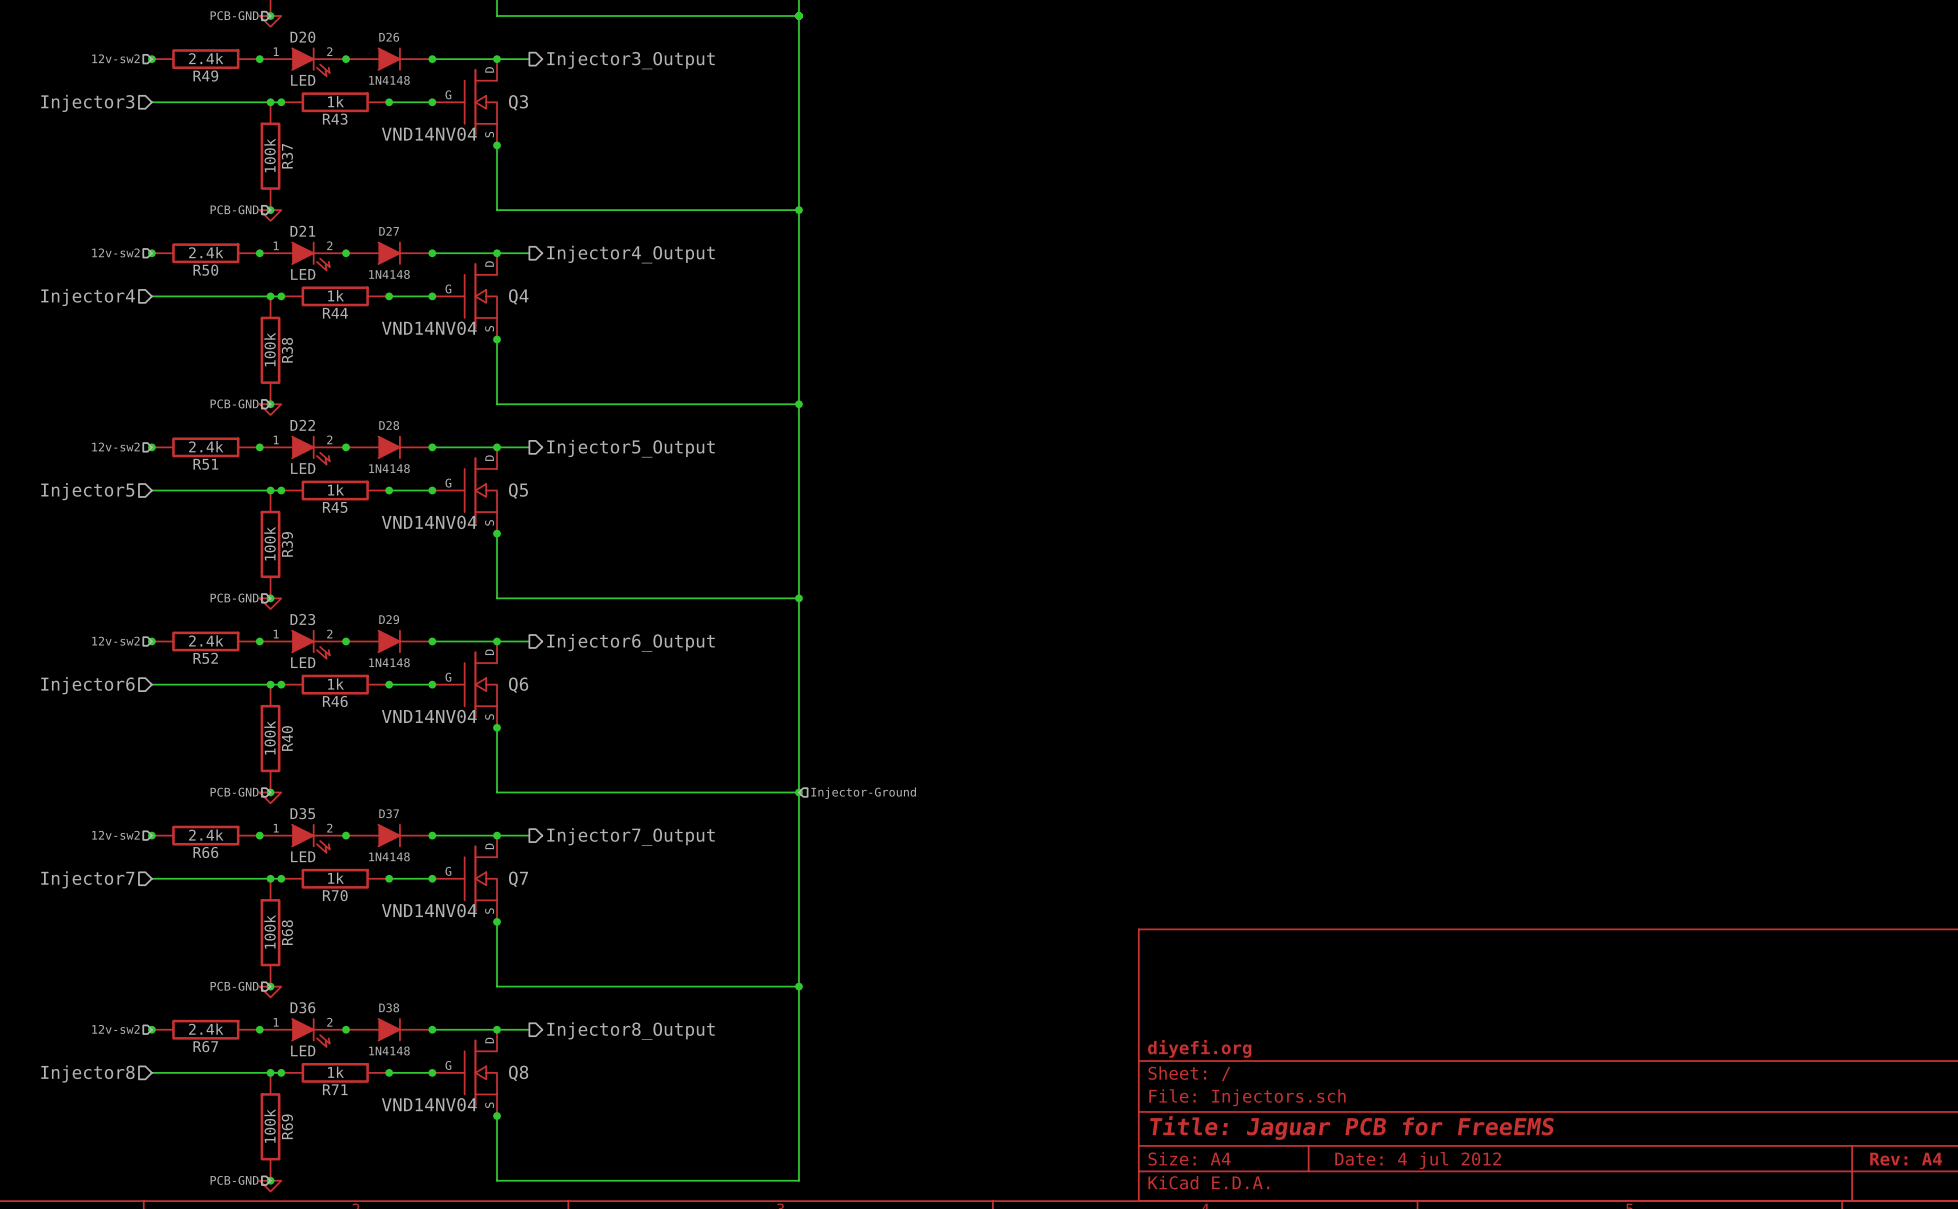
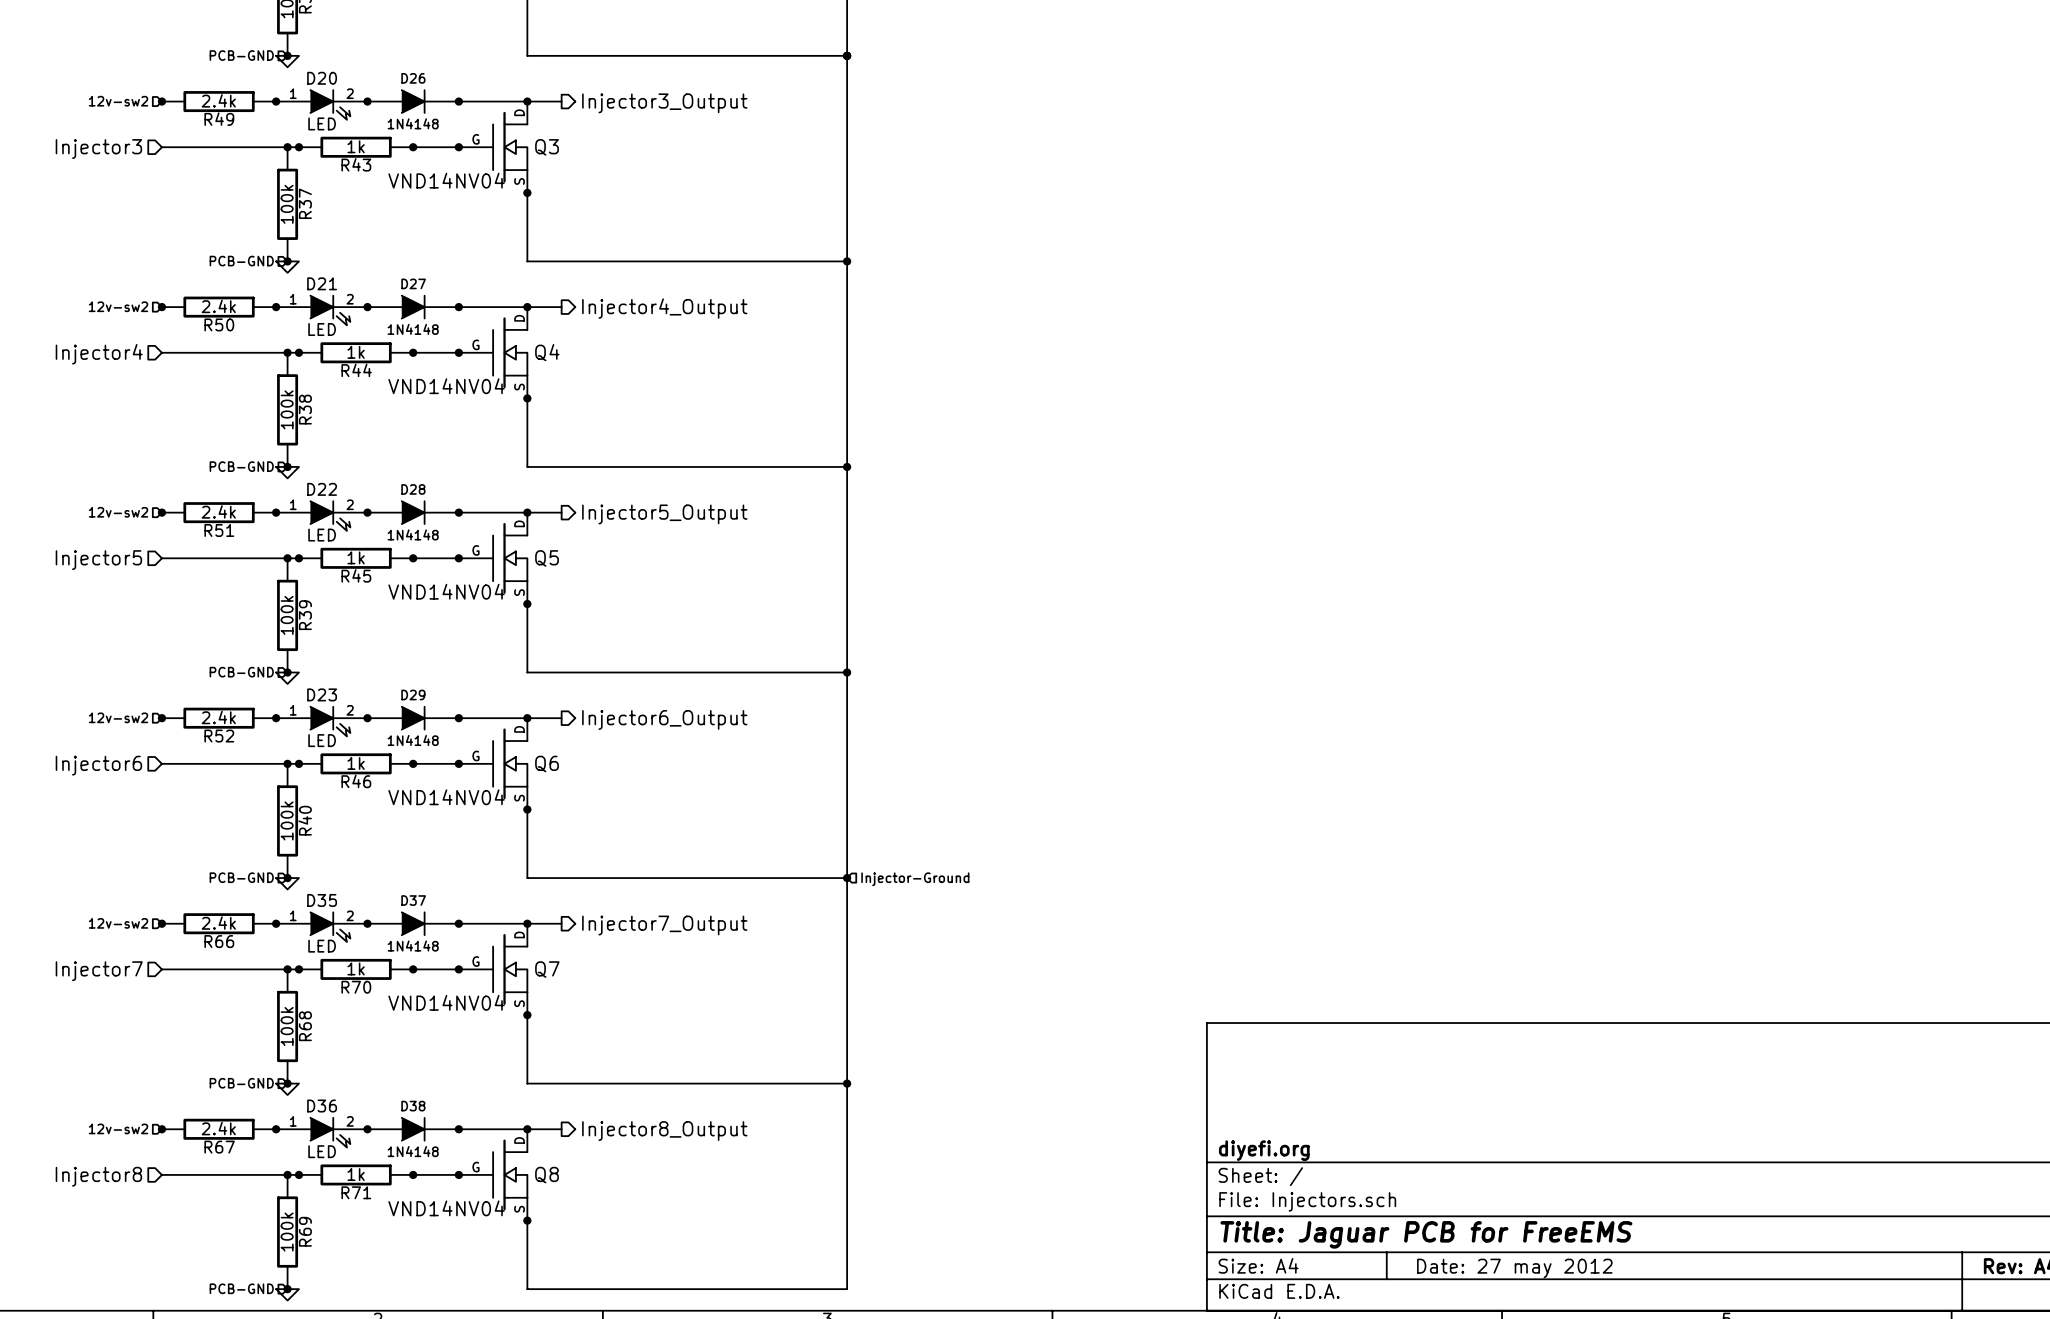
title block: Date: 4 jul 2012 (1418, 1160) -> Date: 27 may 2012 (1514, 1268)

